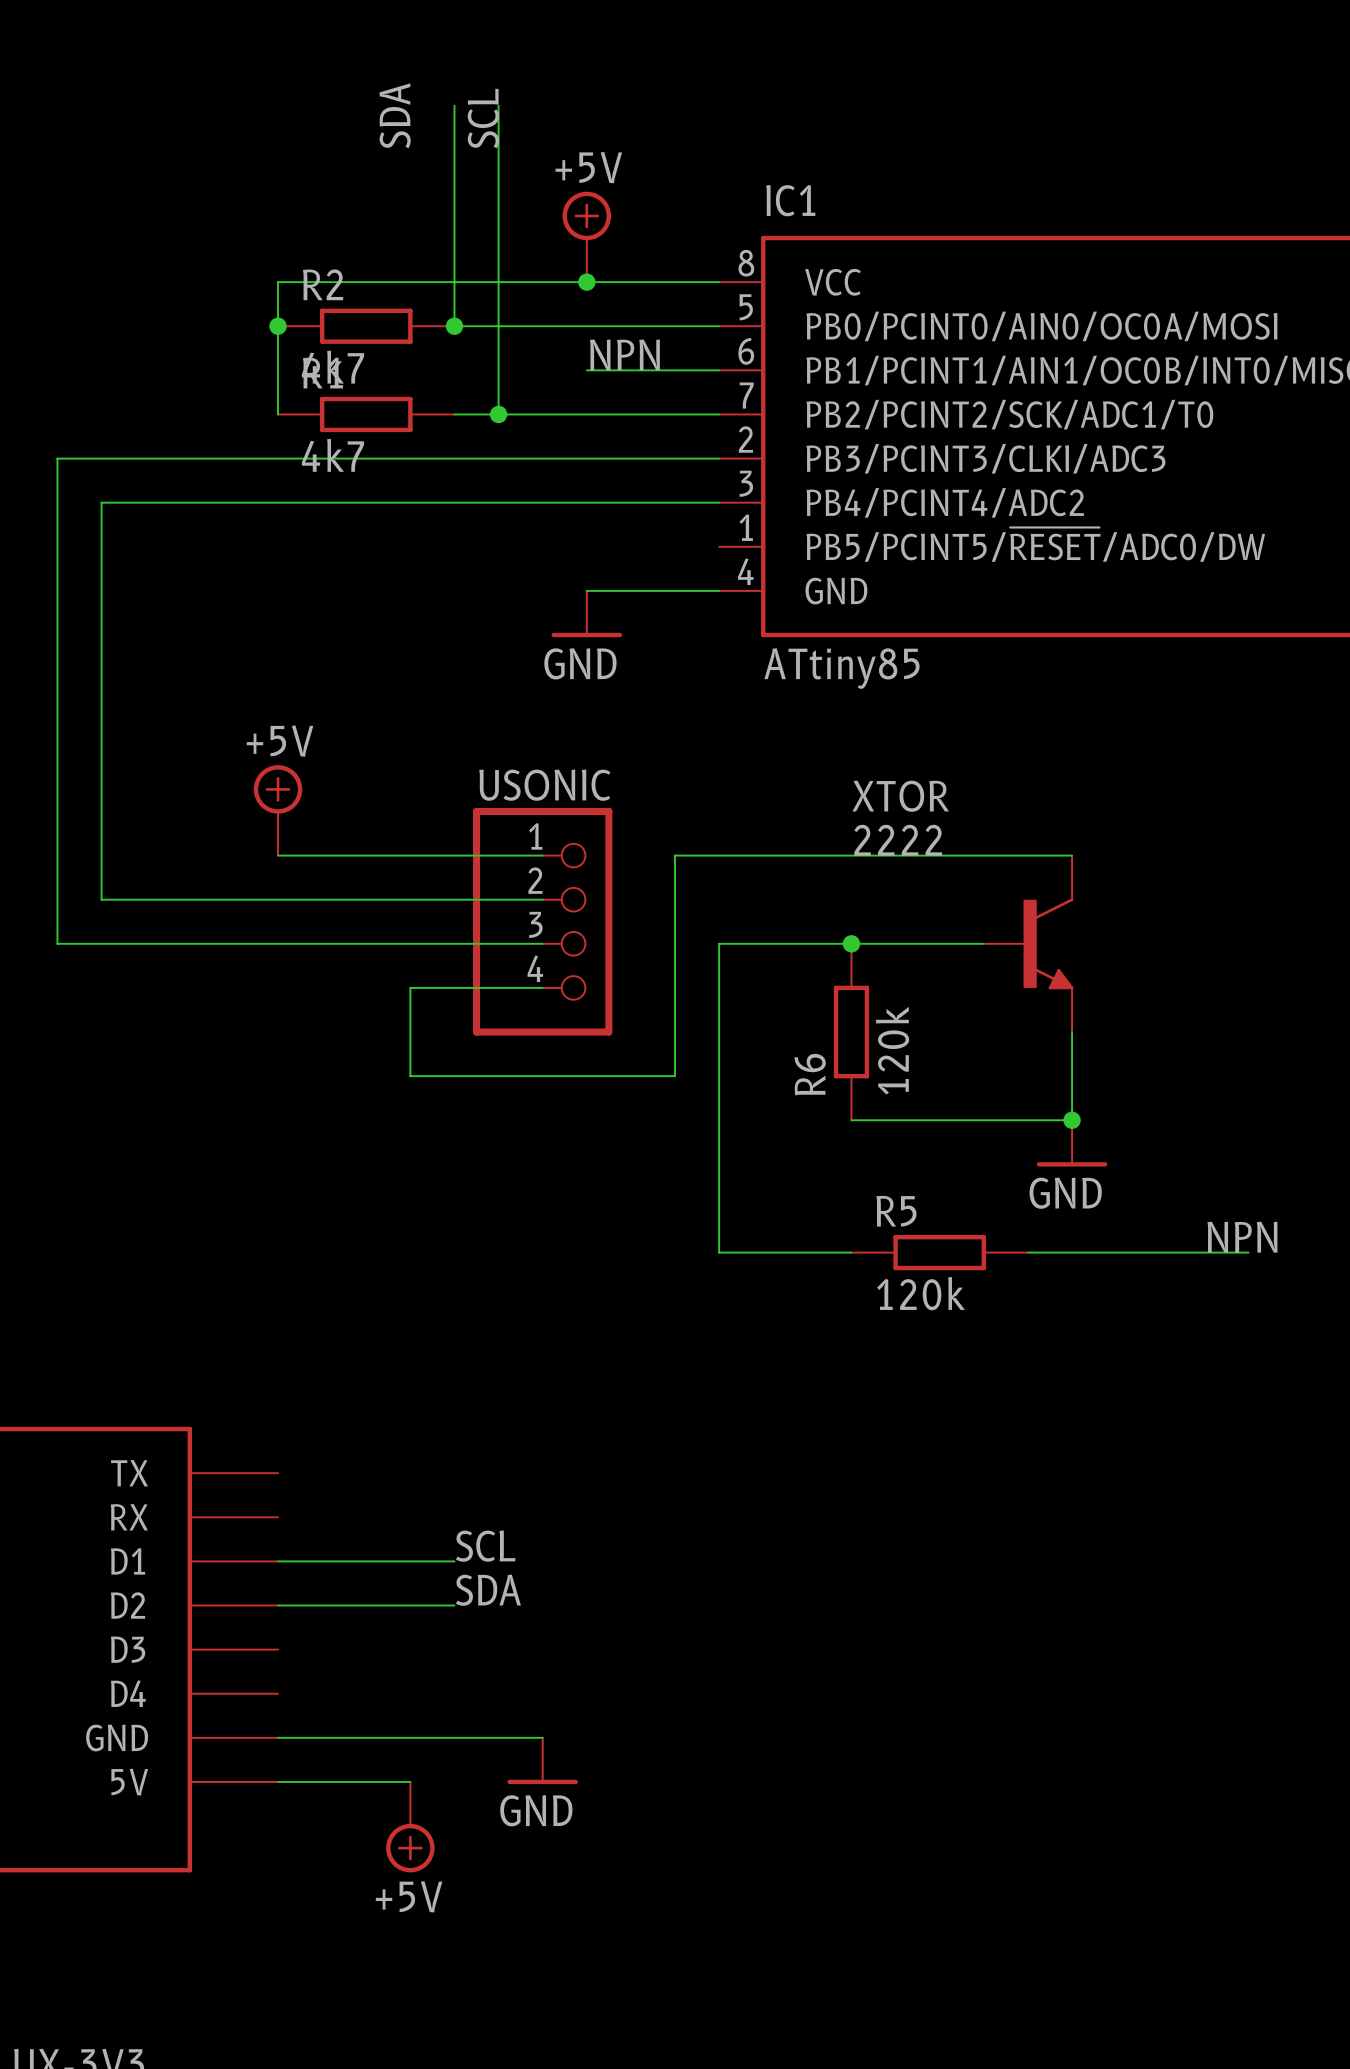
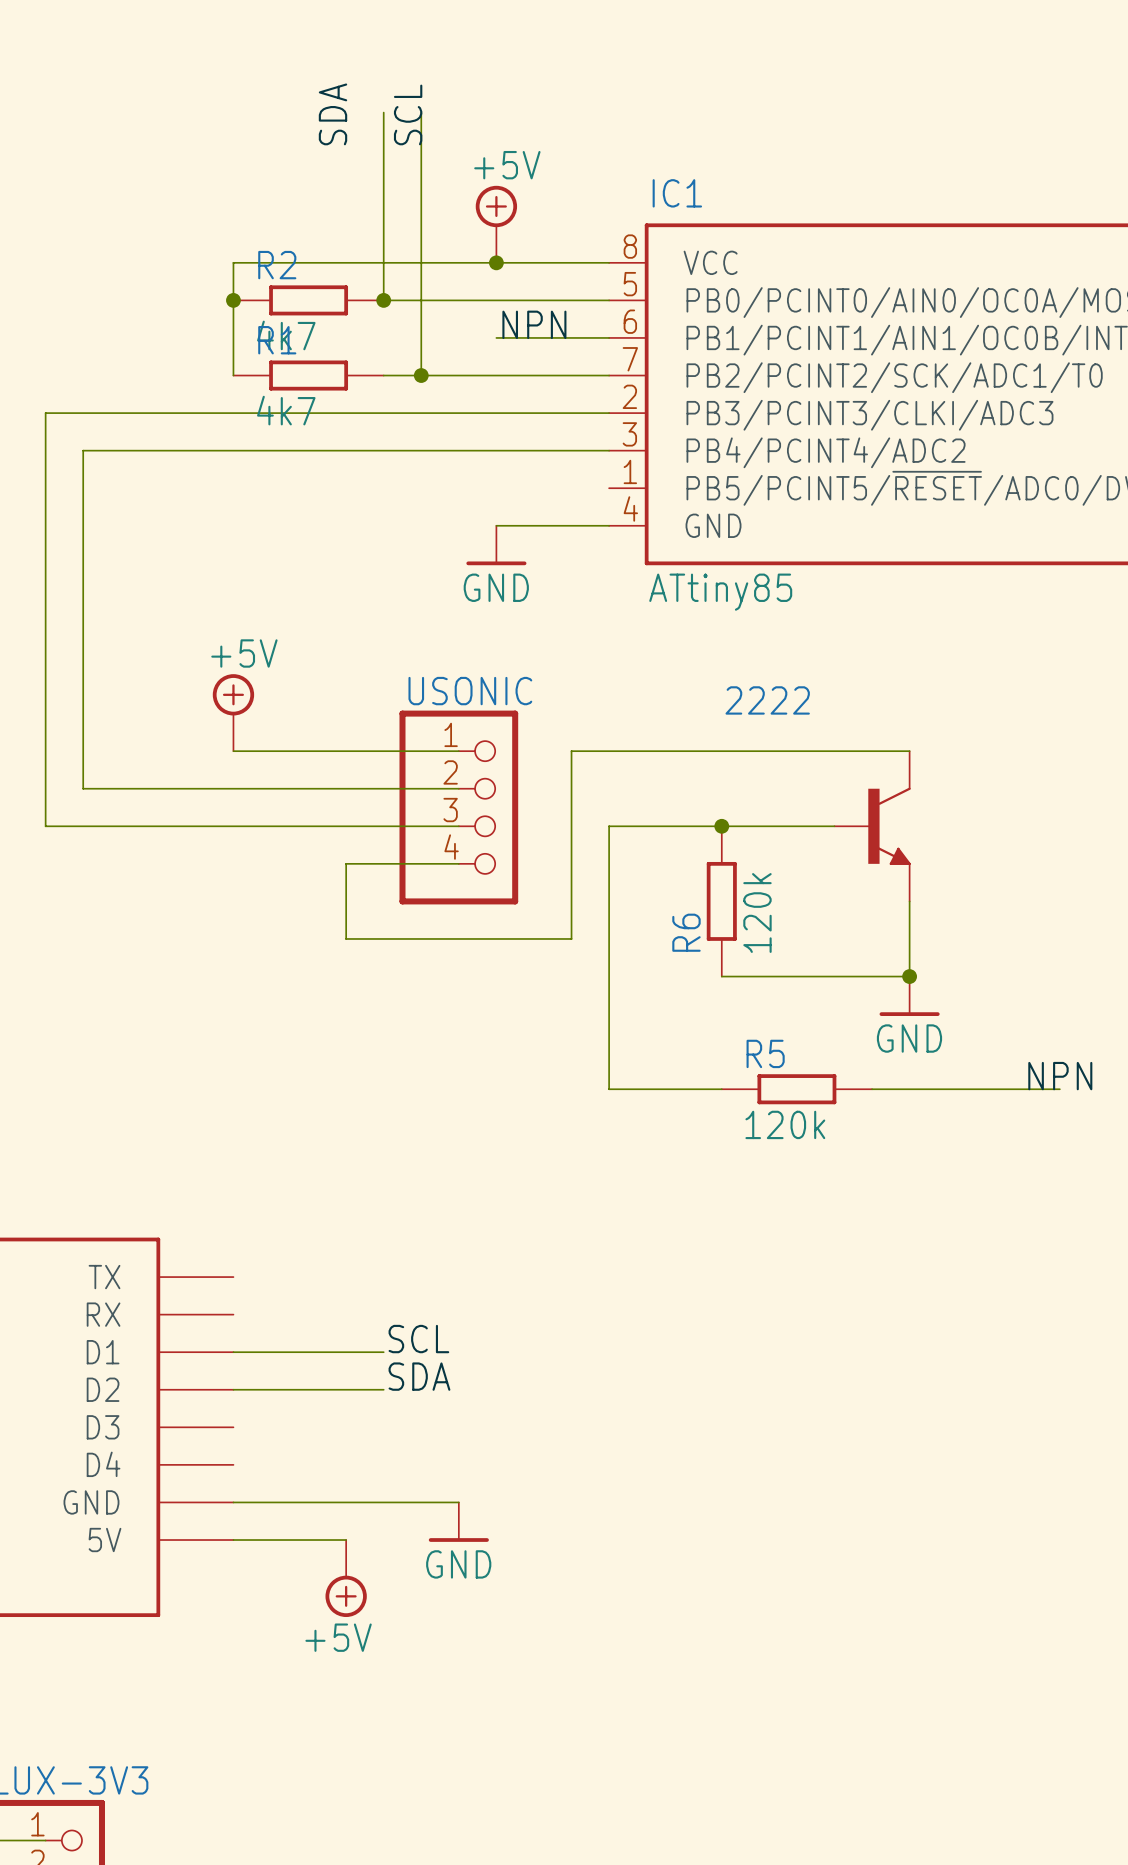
XTOR name: XTOR (900, 796) -> 2222 (767, 700)
XTOR value: 2222 (898, 840) -> none

